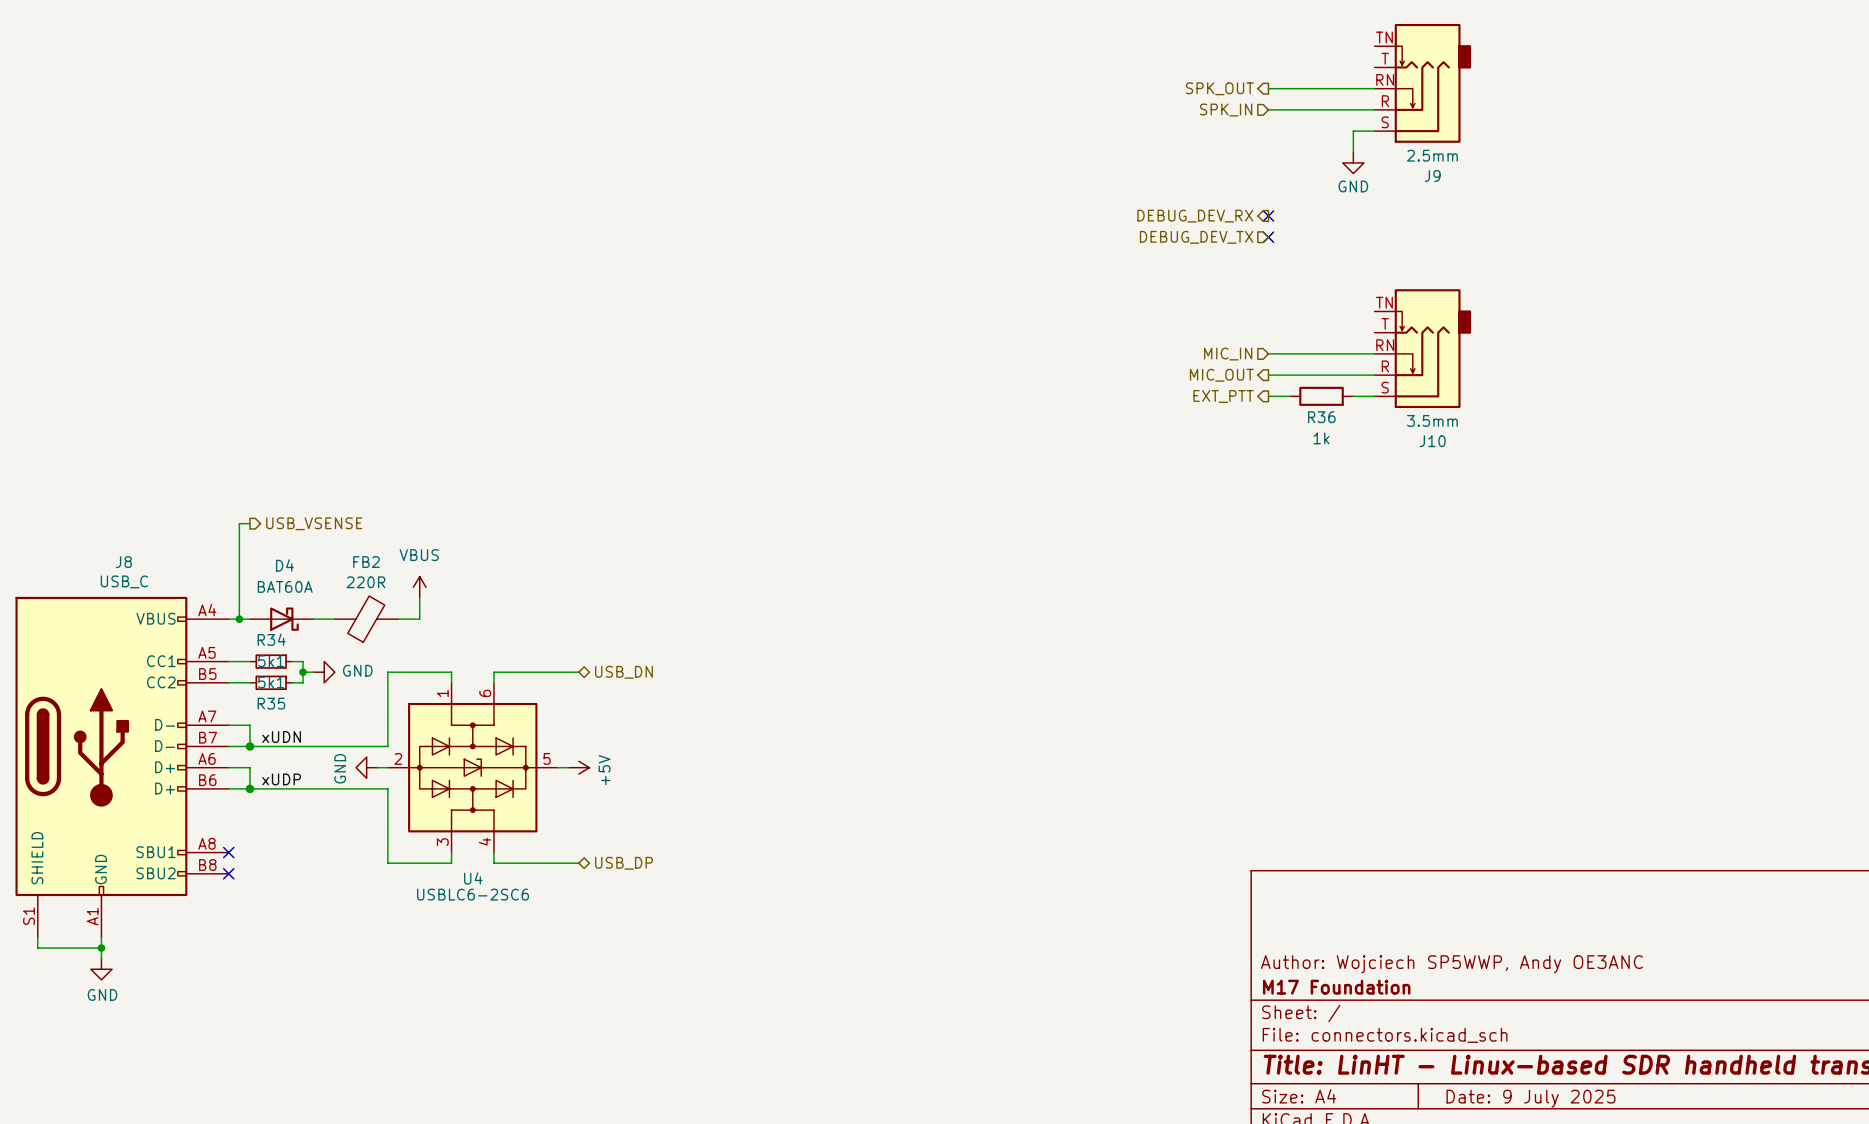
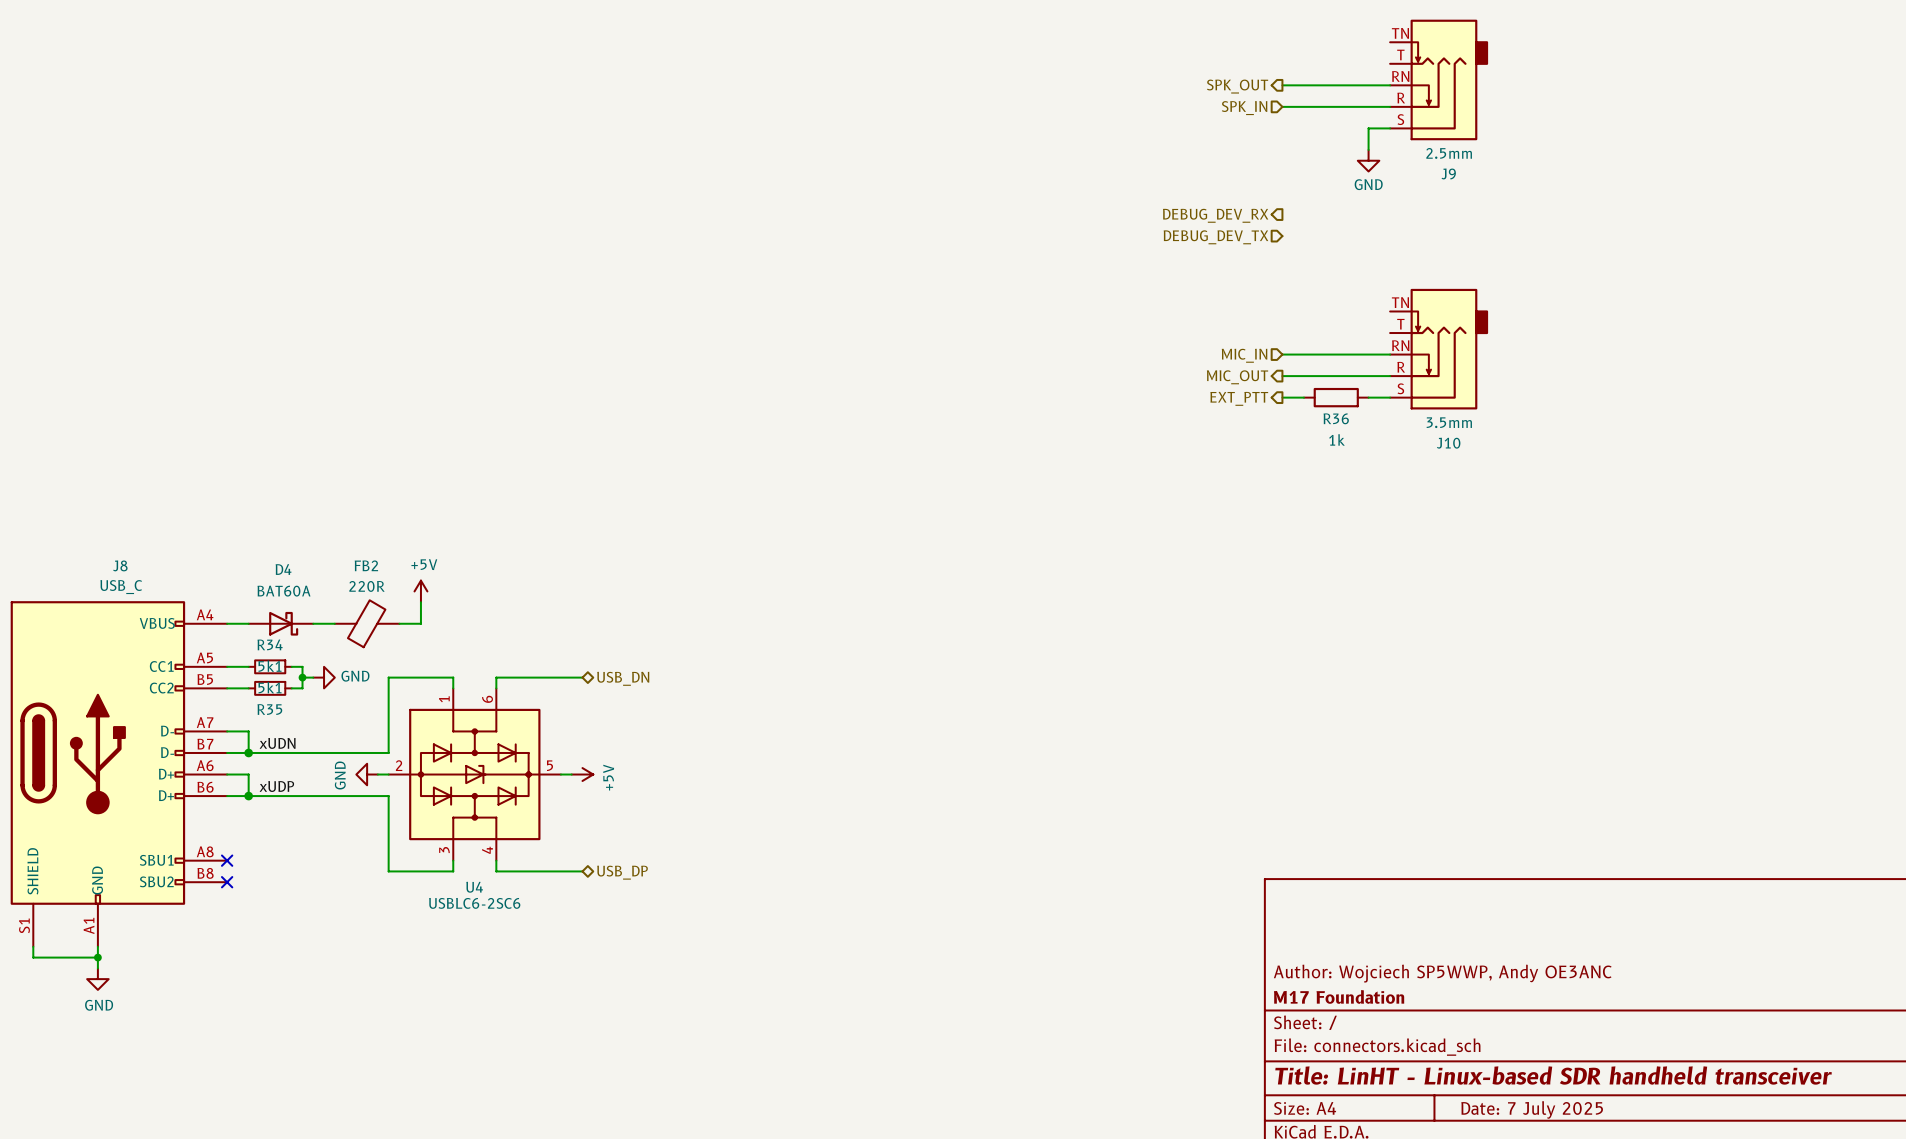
no-connect mark: (1268, 215) -> none
no-connect mark: (1268, 237) -> none
wire: (249, 523) (239, 523) (239, 619) -> none
hierarchical label: USB_VSENSE (314, 523) -> none
power symbol: VBUS (419, 587) -> +5V (420, 591)
junction: (239, 619) -> none
title block: Date: 9 July 2025 (1530, 1098) -> Date: 7 July 2025 (1532, 1109)

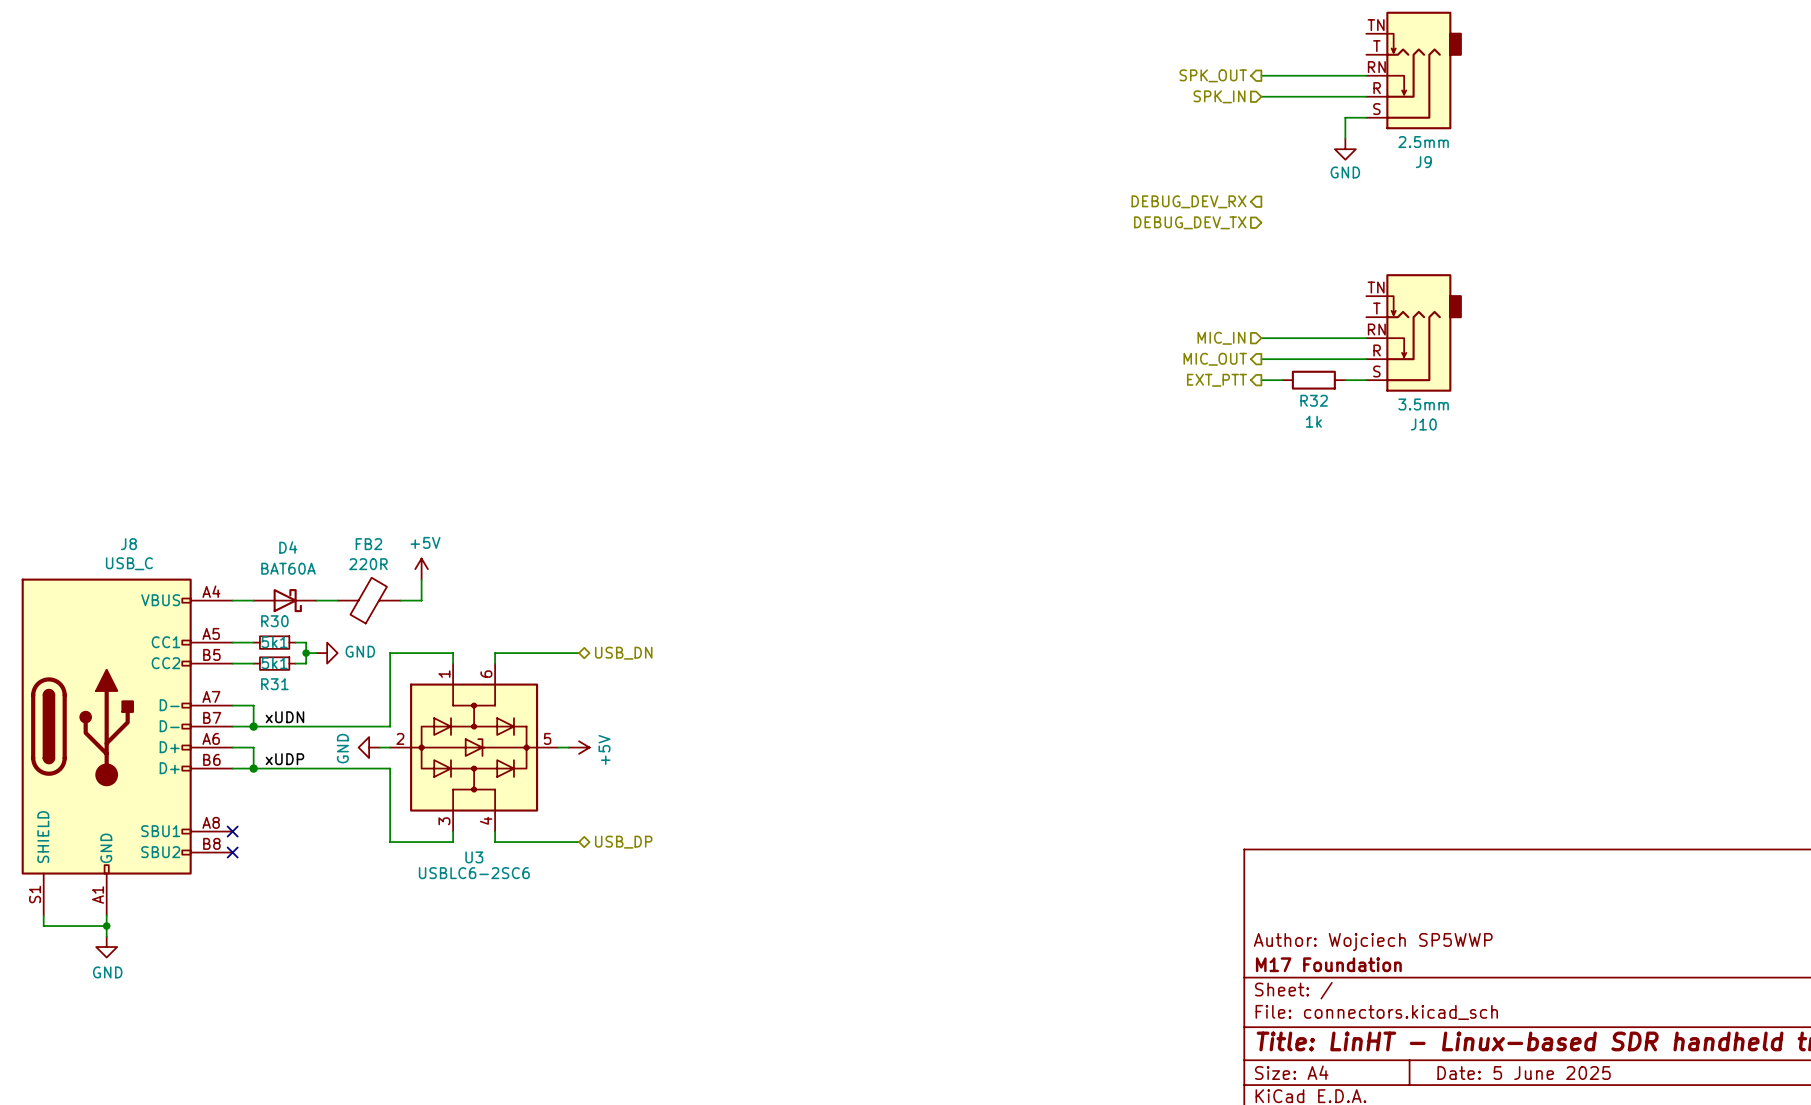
R36 name: R36 (1336, 418) -> R32 (1314, 400)
R34 name: R34 (270, 644) -> R30 (274, 621)
R35 name: R35 (269, 709) -> R31 (274, 684)
U4 name: U4 (474, 887) -> U3 (474, 857)
title block: Author: Wojciech SP5WWP, Andy OE3ANC (1442, 973) -> Author: Wojciech SP5WWP (1373, 942)
title block: Date: 7 July 2025 (1532, 1109) -> Date: 5 June 2025 (1524, 1073)

